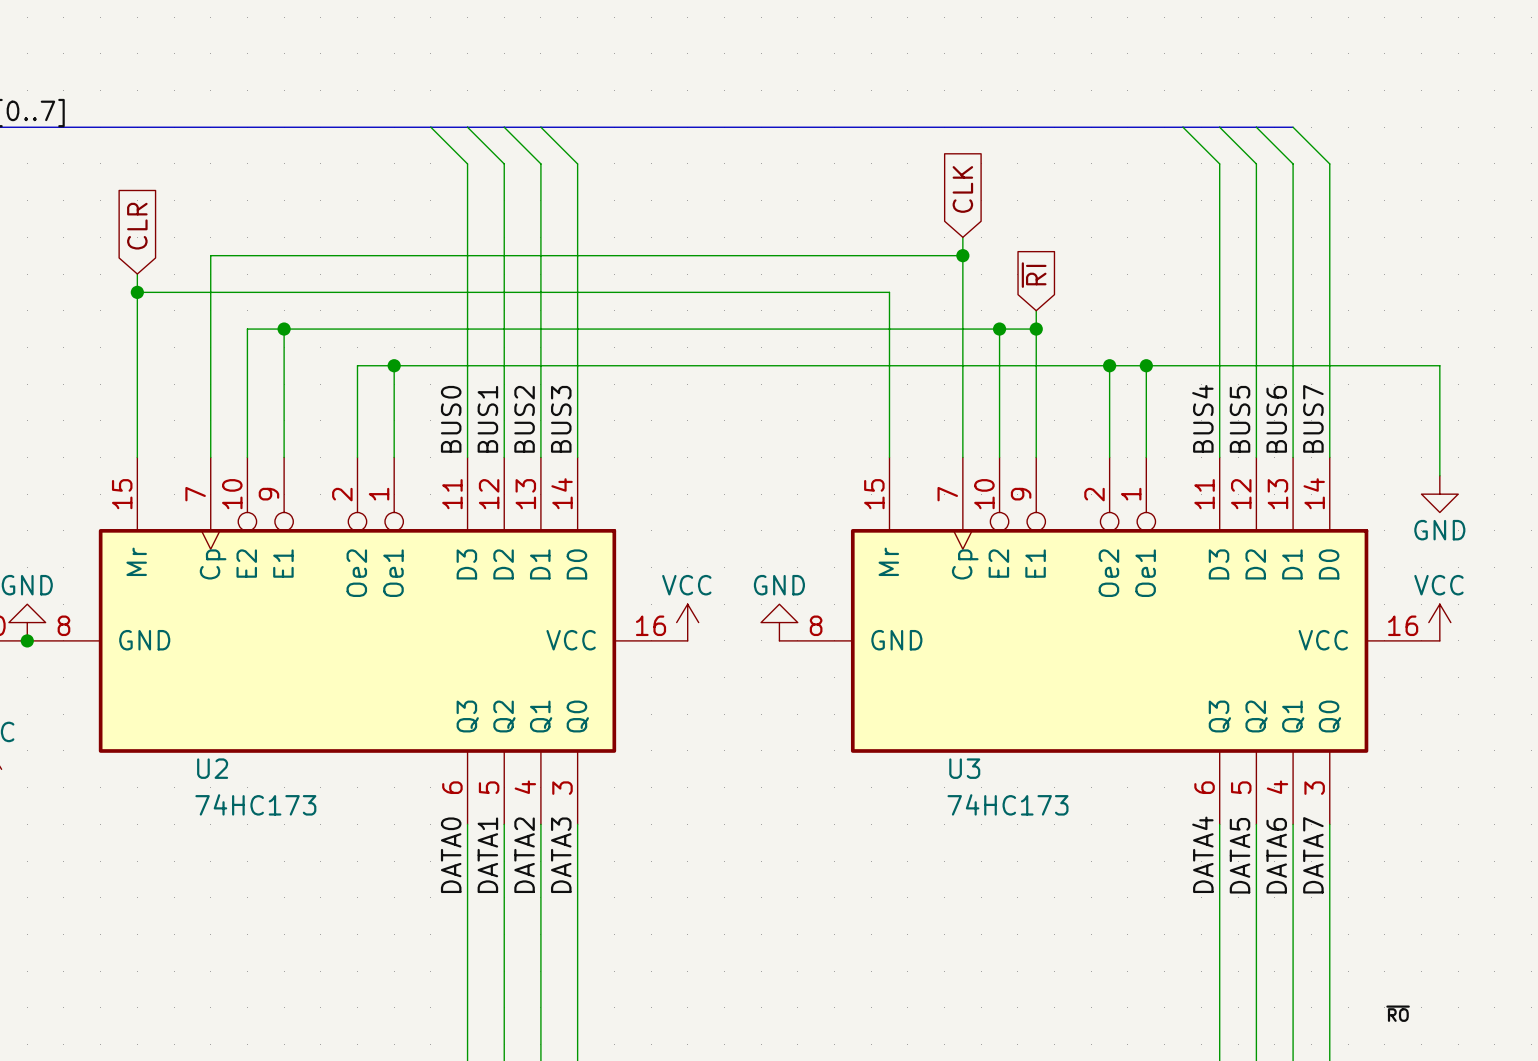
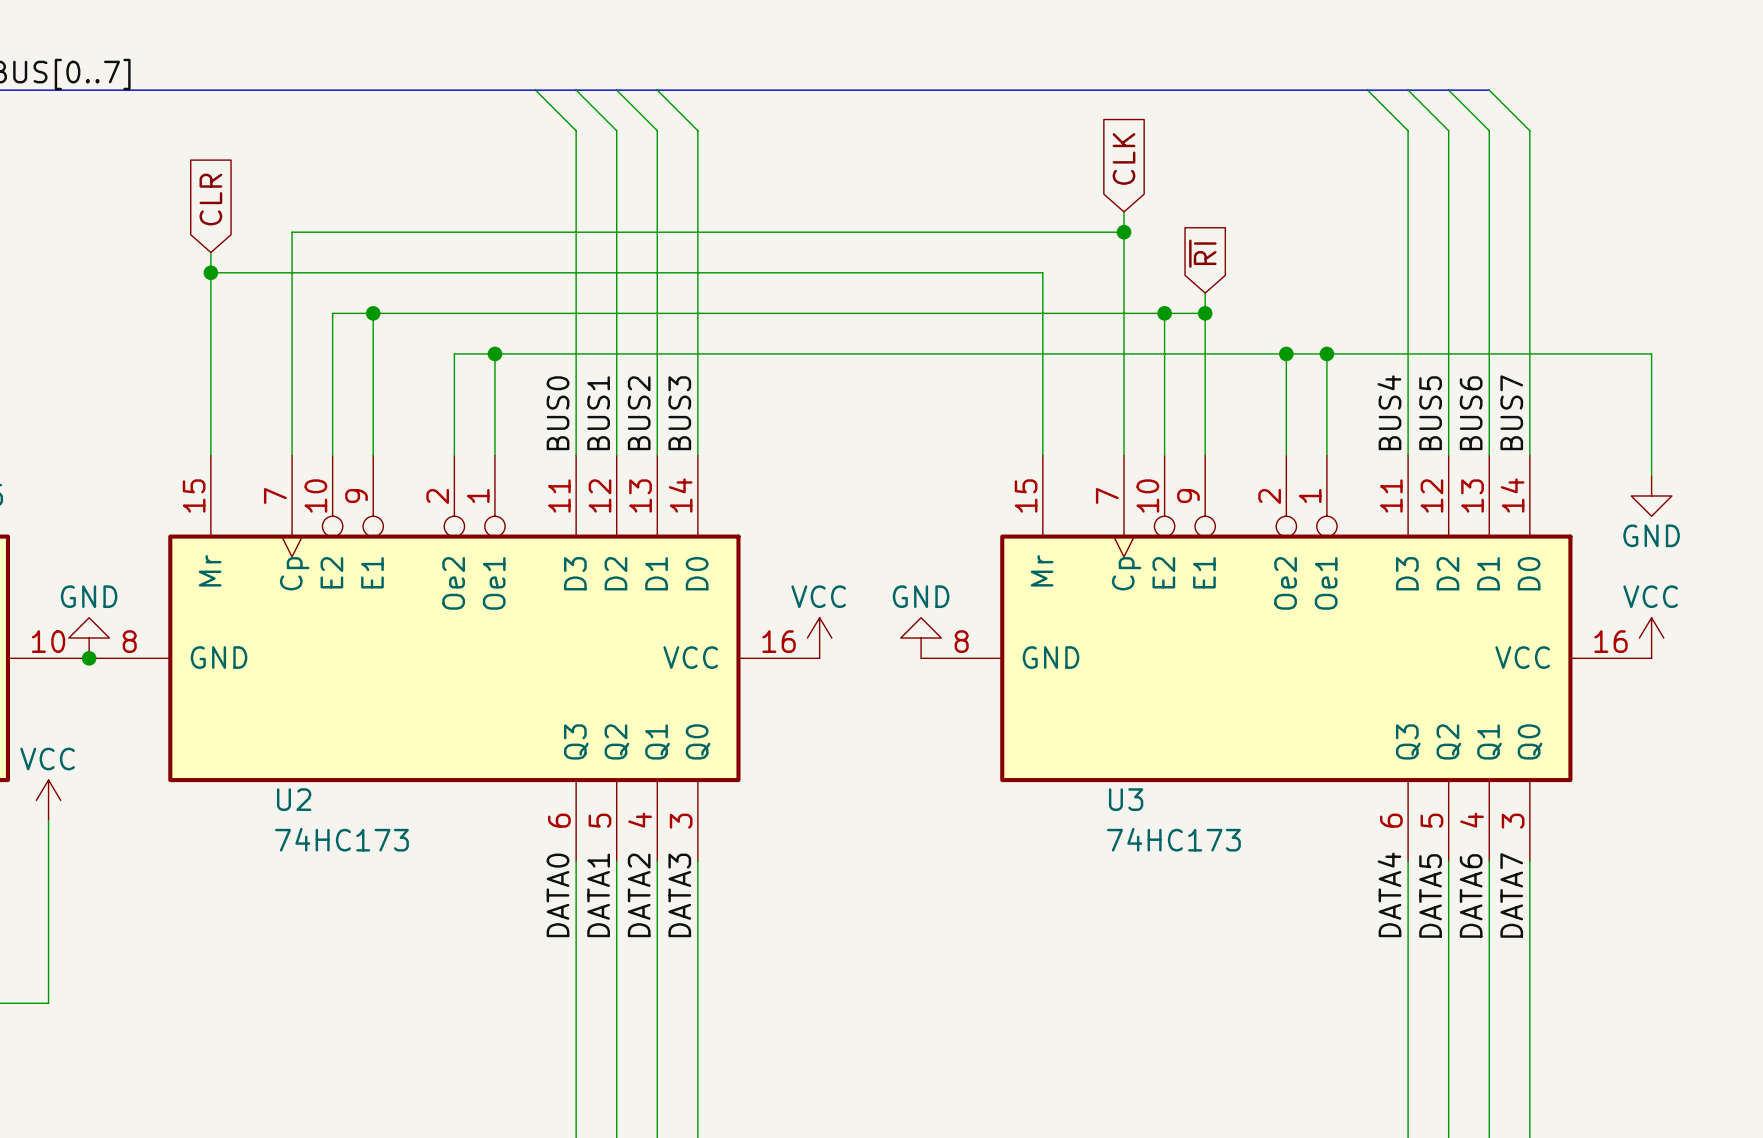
label: ~{RO} (1398, 1013) -> none

